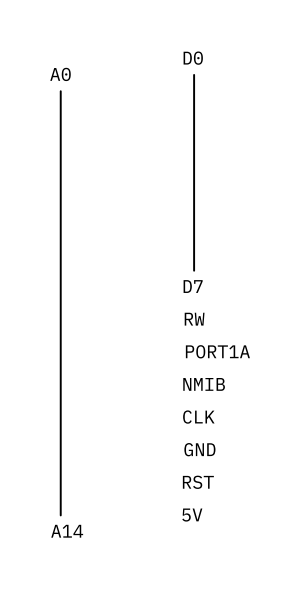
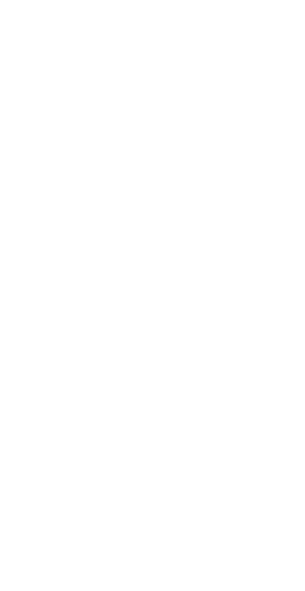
text: D0 (193, 58) -> none
text: A0 (60, 74) -> none
line: (194, 74) (194, 270) -> none
line: (60, 91) (60, 515) -> none
text: D7 (193, 286) -> none
text: RW (194, 319) -> none
text: PORT1A (217, 351) -> none
text: NMIB (204, 384) -> none
text: CLK (198, 417) -> none
text: GND (199, 449) -> none
text: RST (198, 482) -> none
text: 5V (192, 515) -> none
text: A14 (67, 531) -> none

